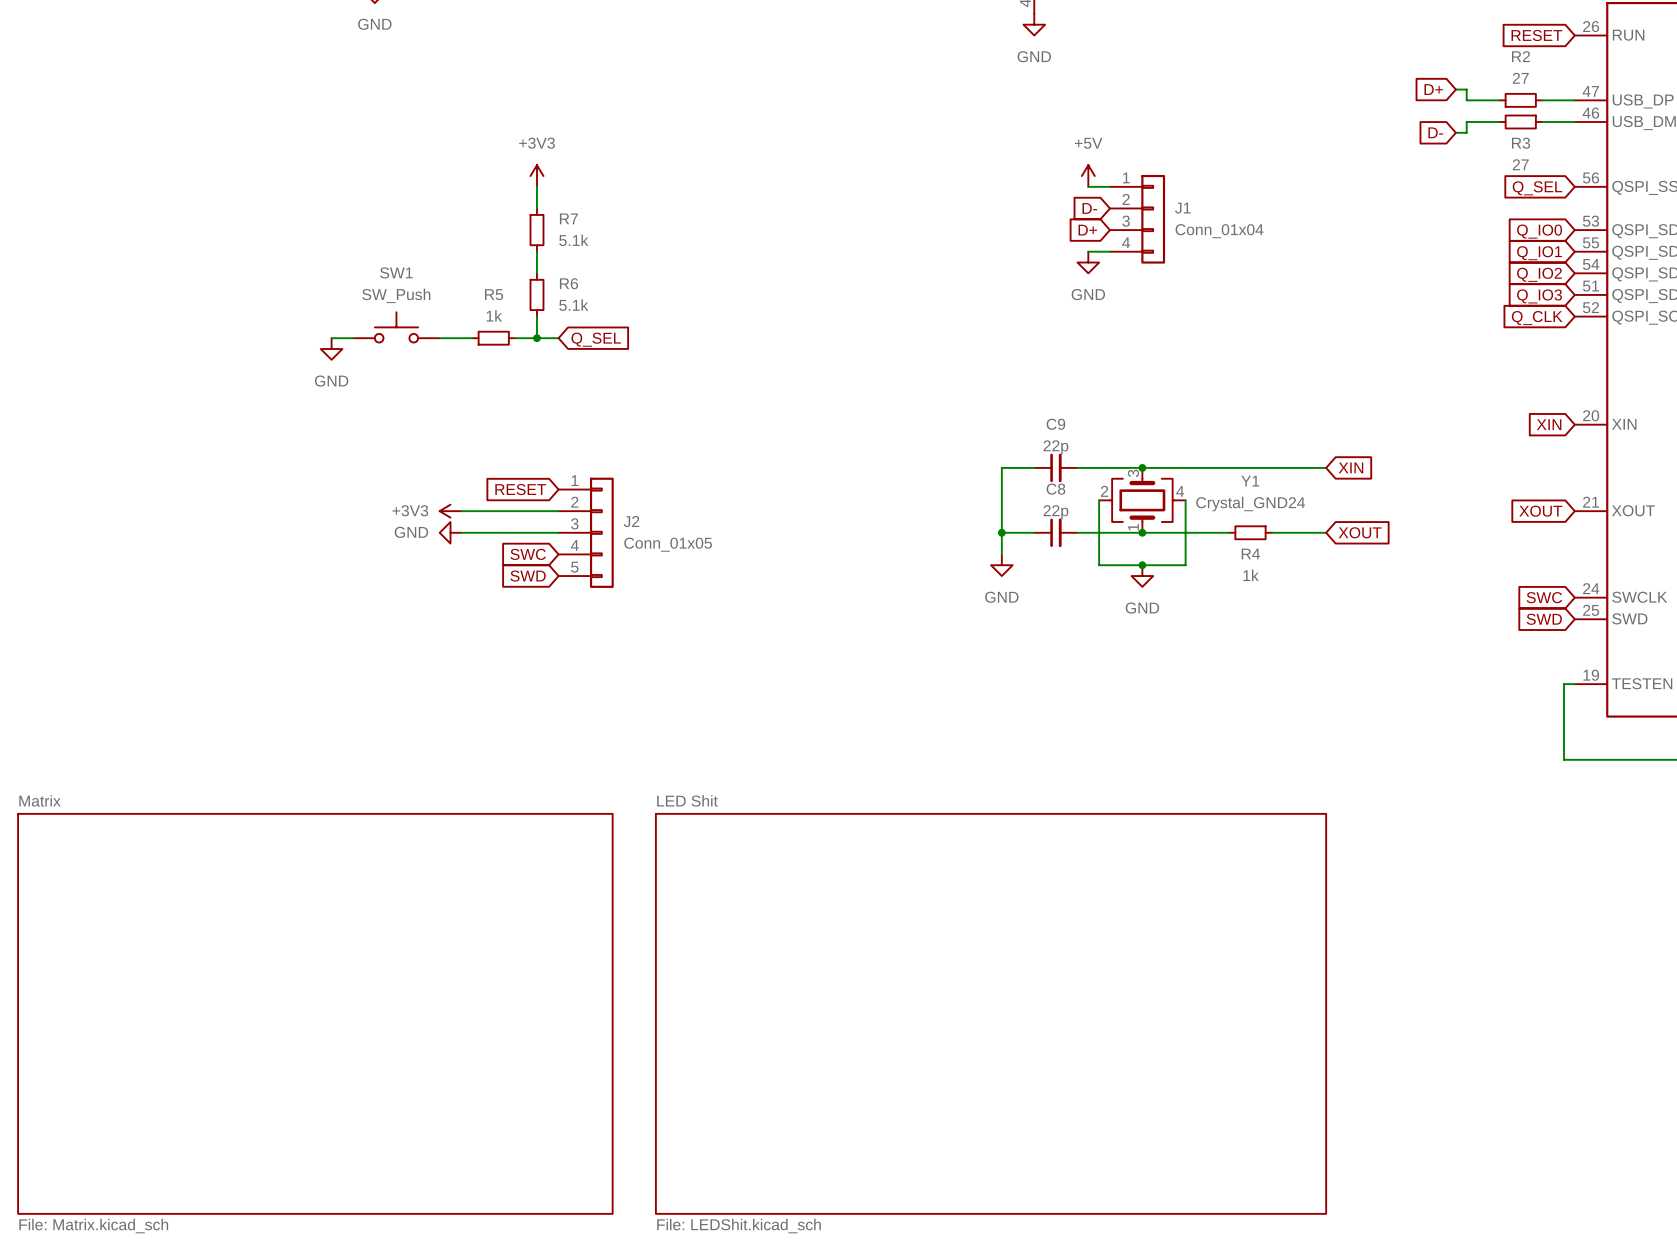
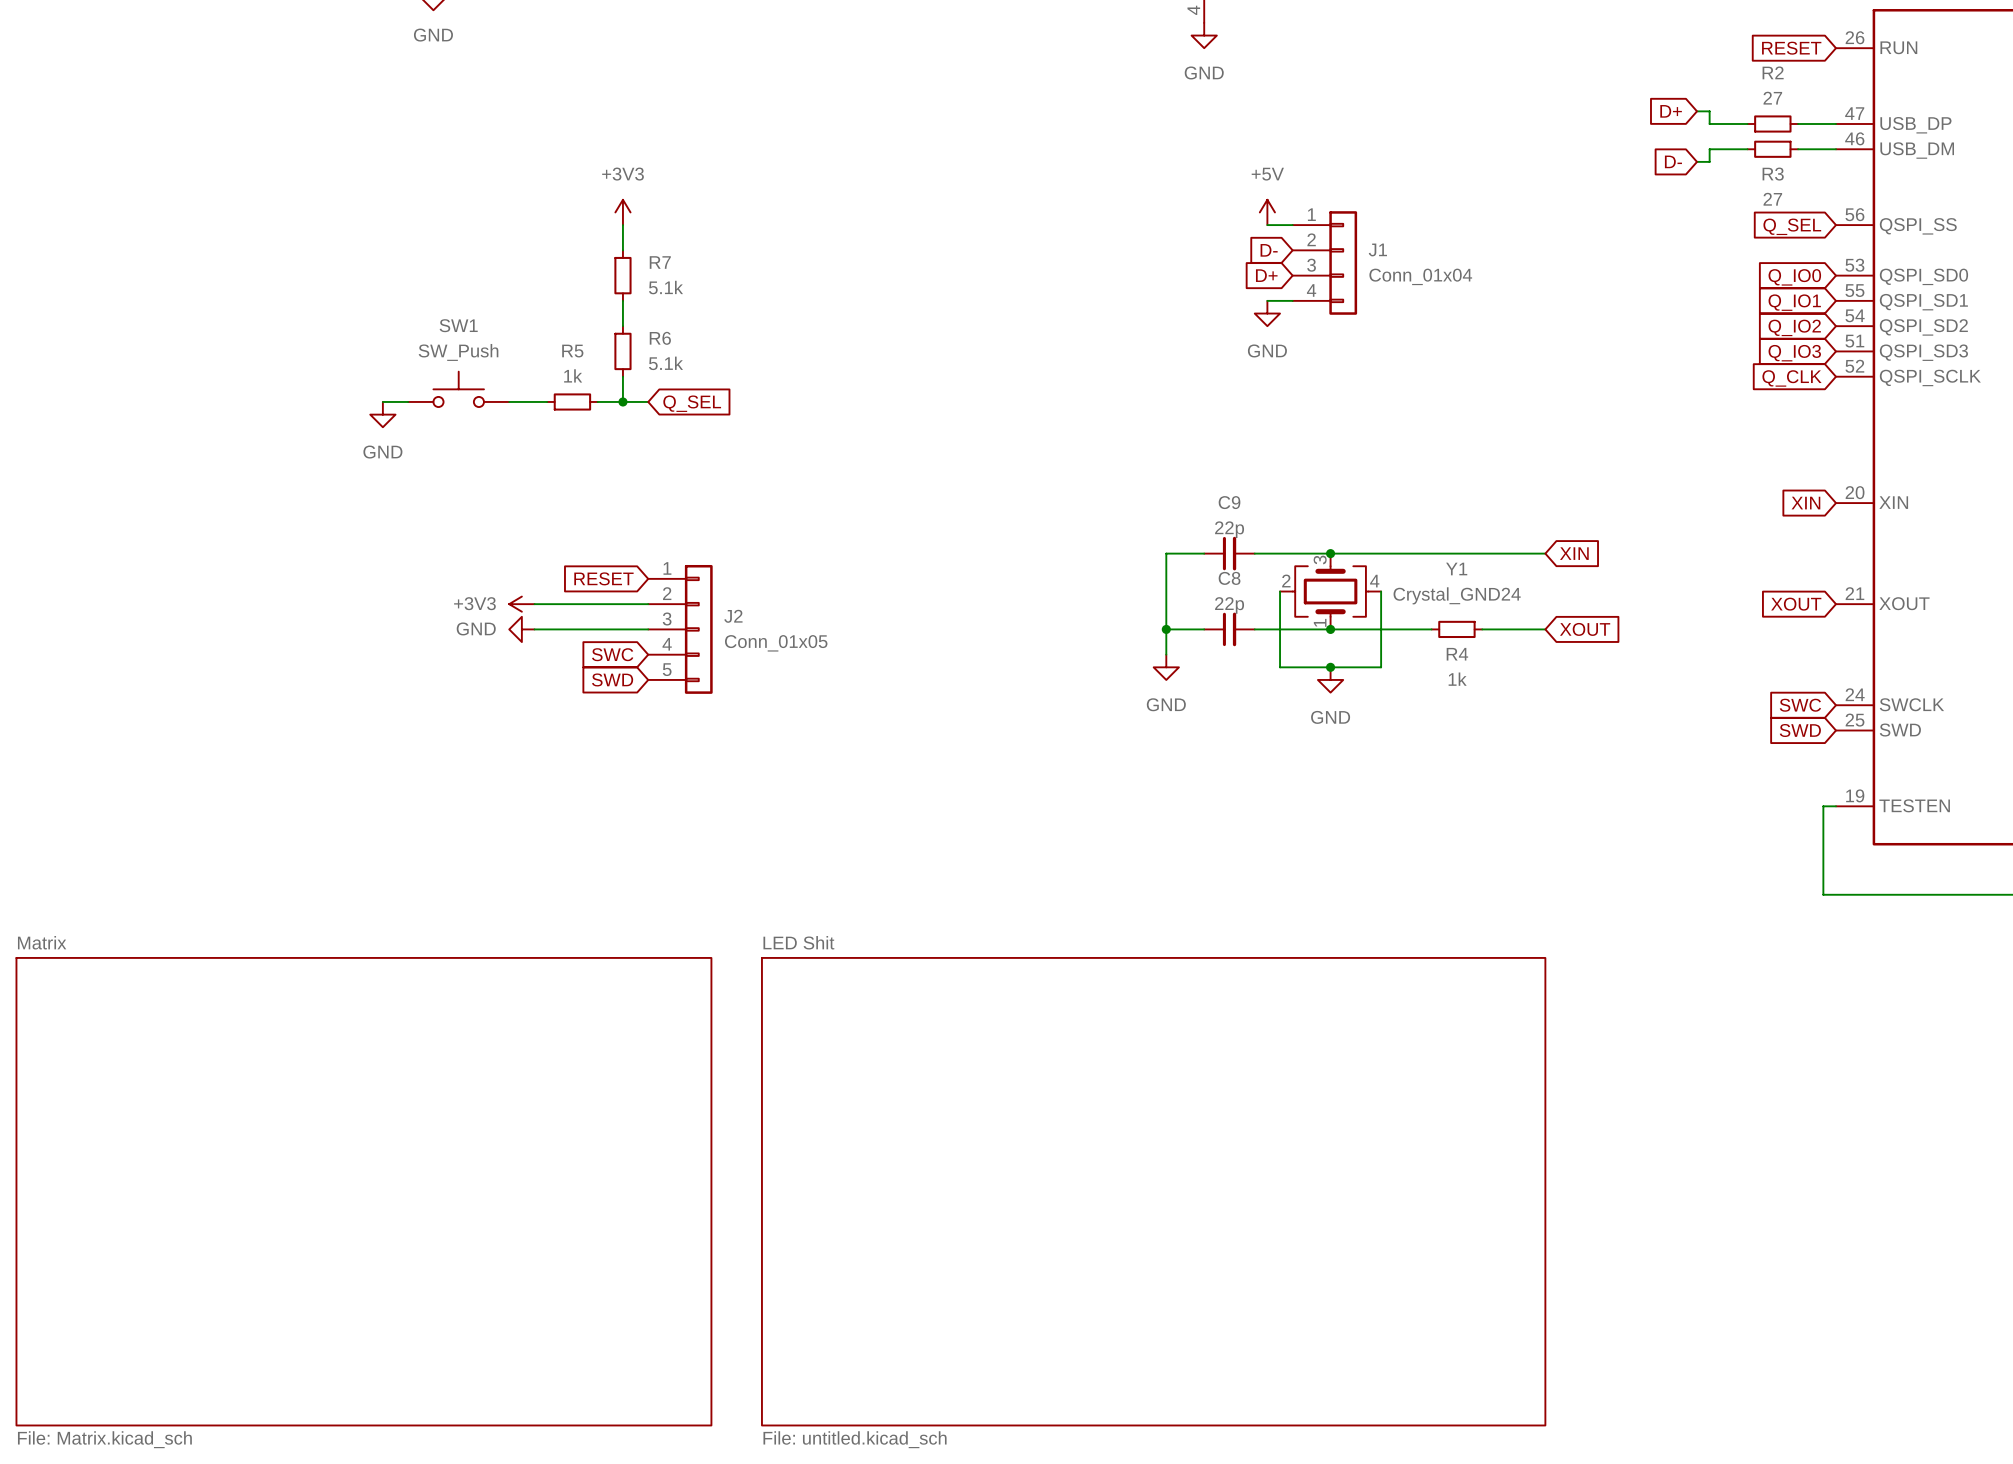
sheet LED Shit value: File: LEDShit.kicad_sch (739, 1226) -> File: untitled.kicad_sch (855, 1439)

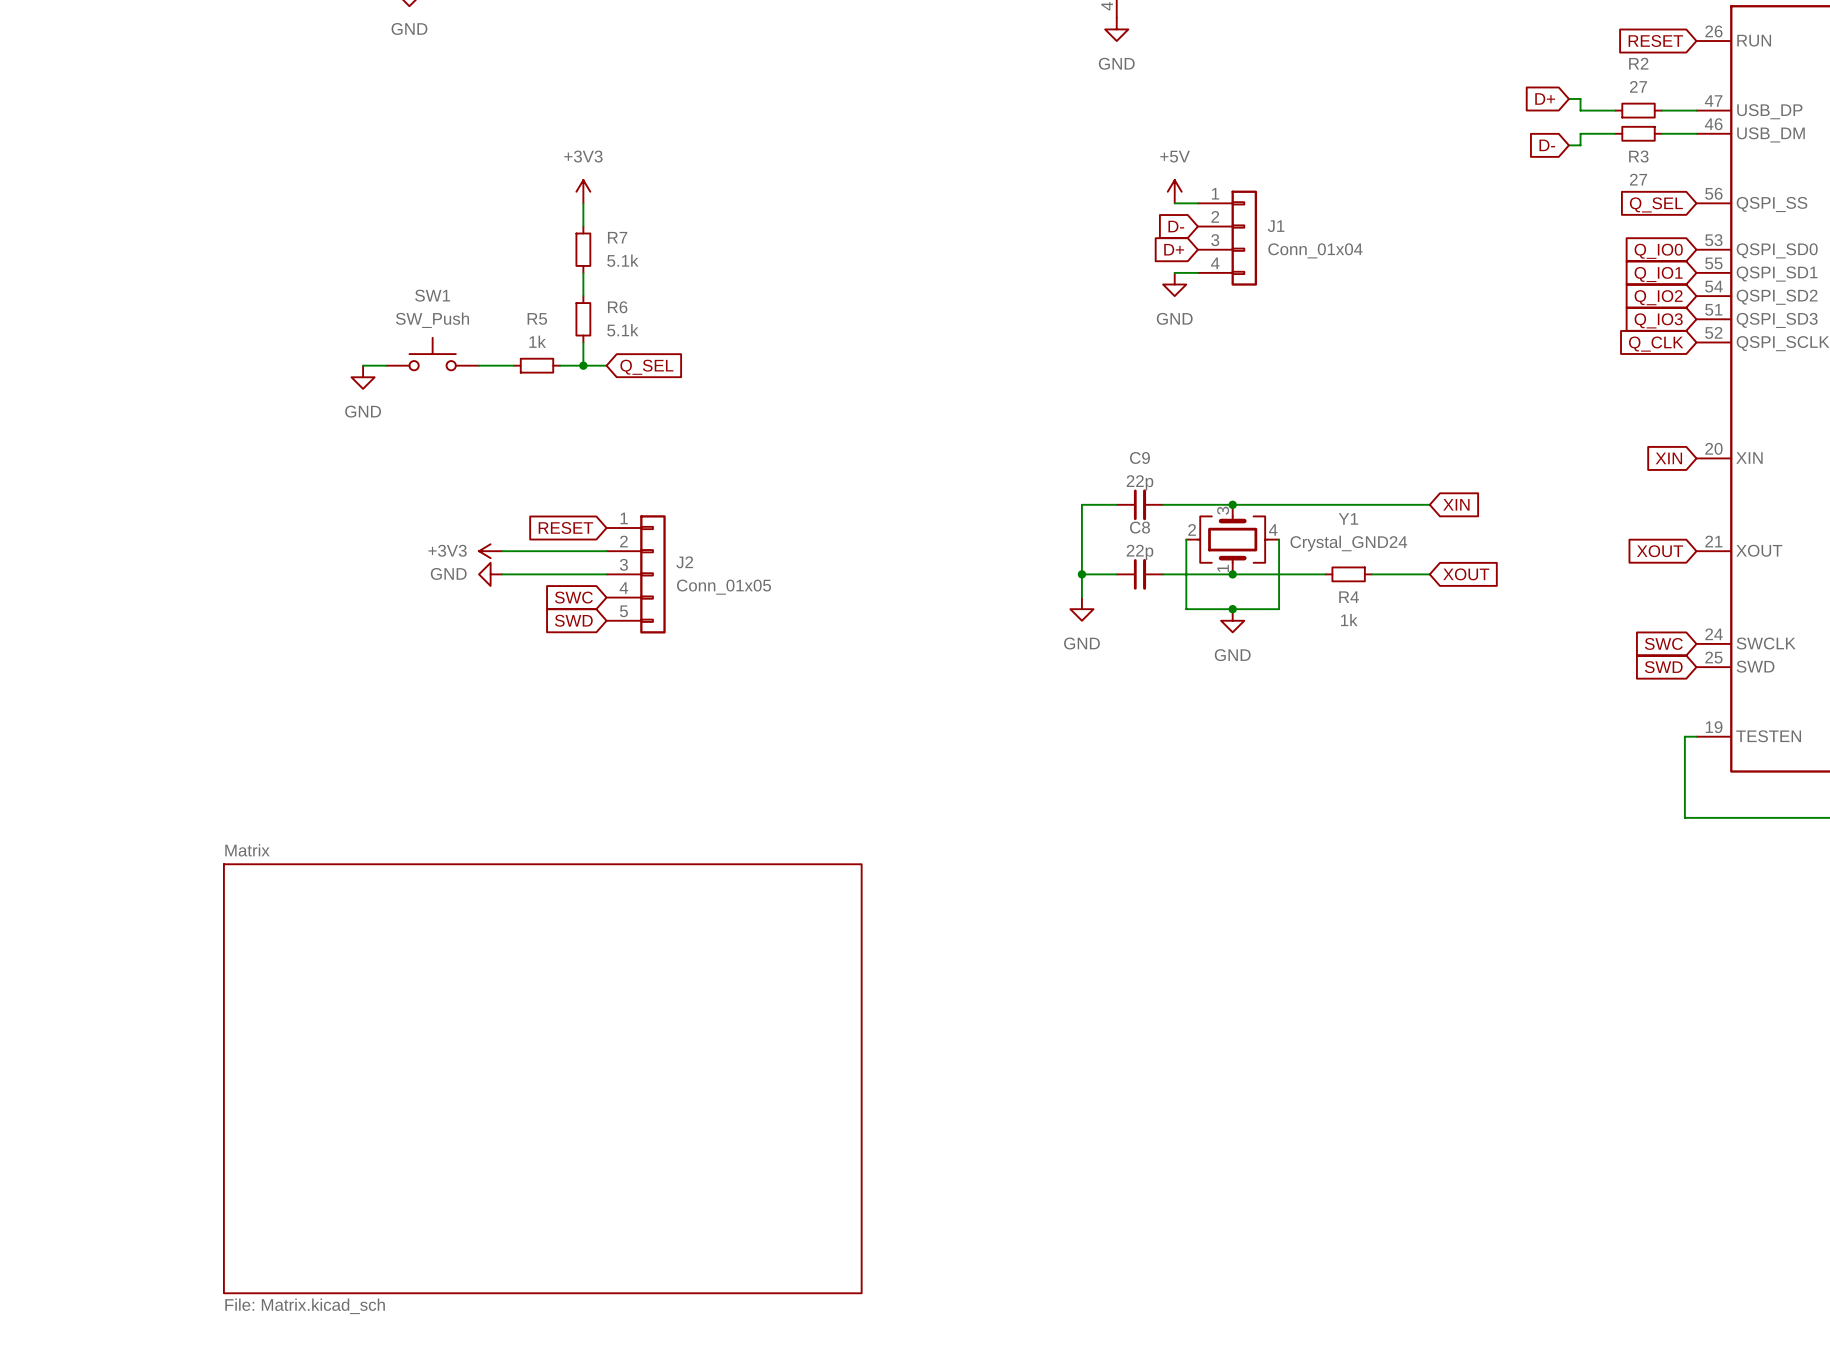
sheet Matrix position: (363, 1191) -> (542, 1078)
sheet LED Shit: File: untitled.kicad_sch (1153, 1191) -> none

